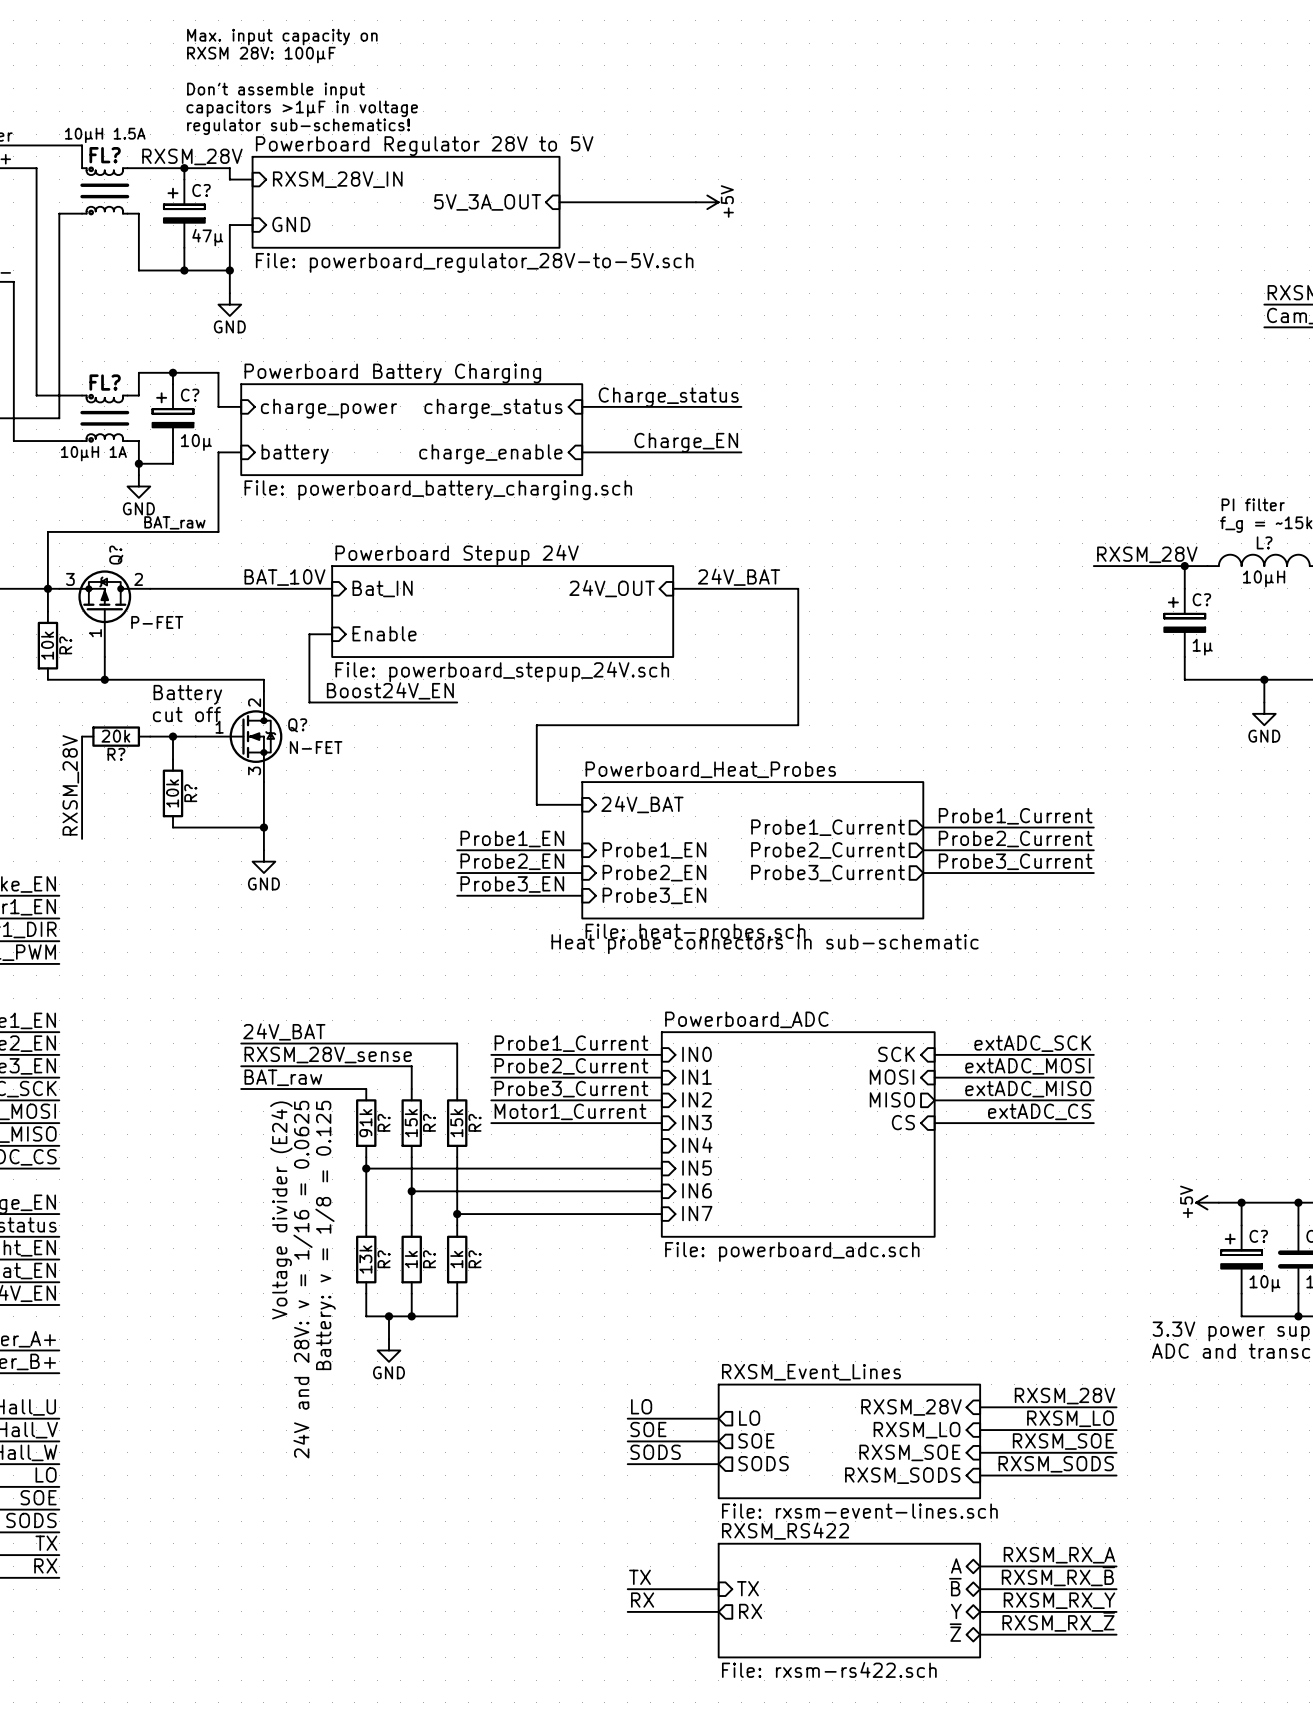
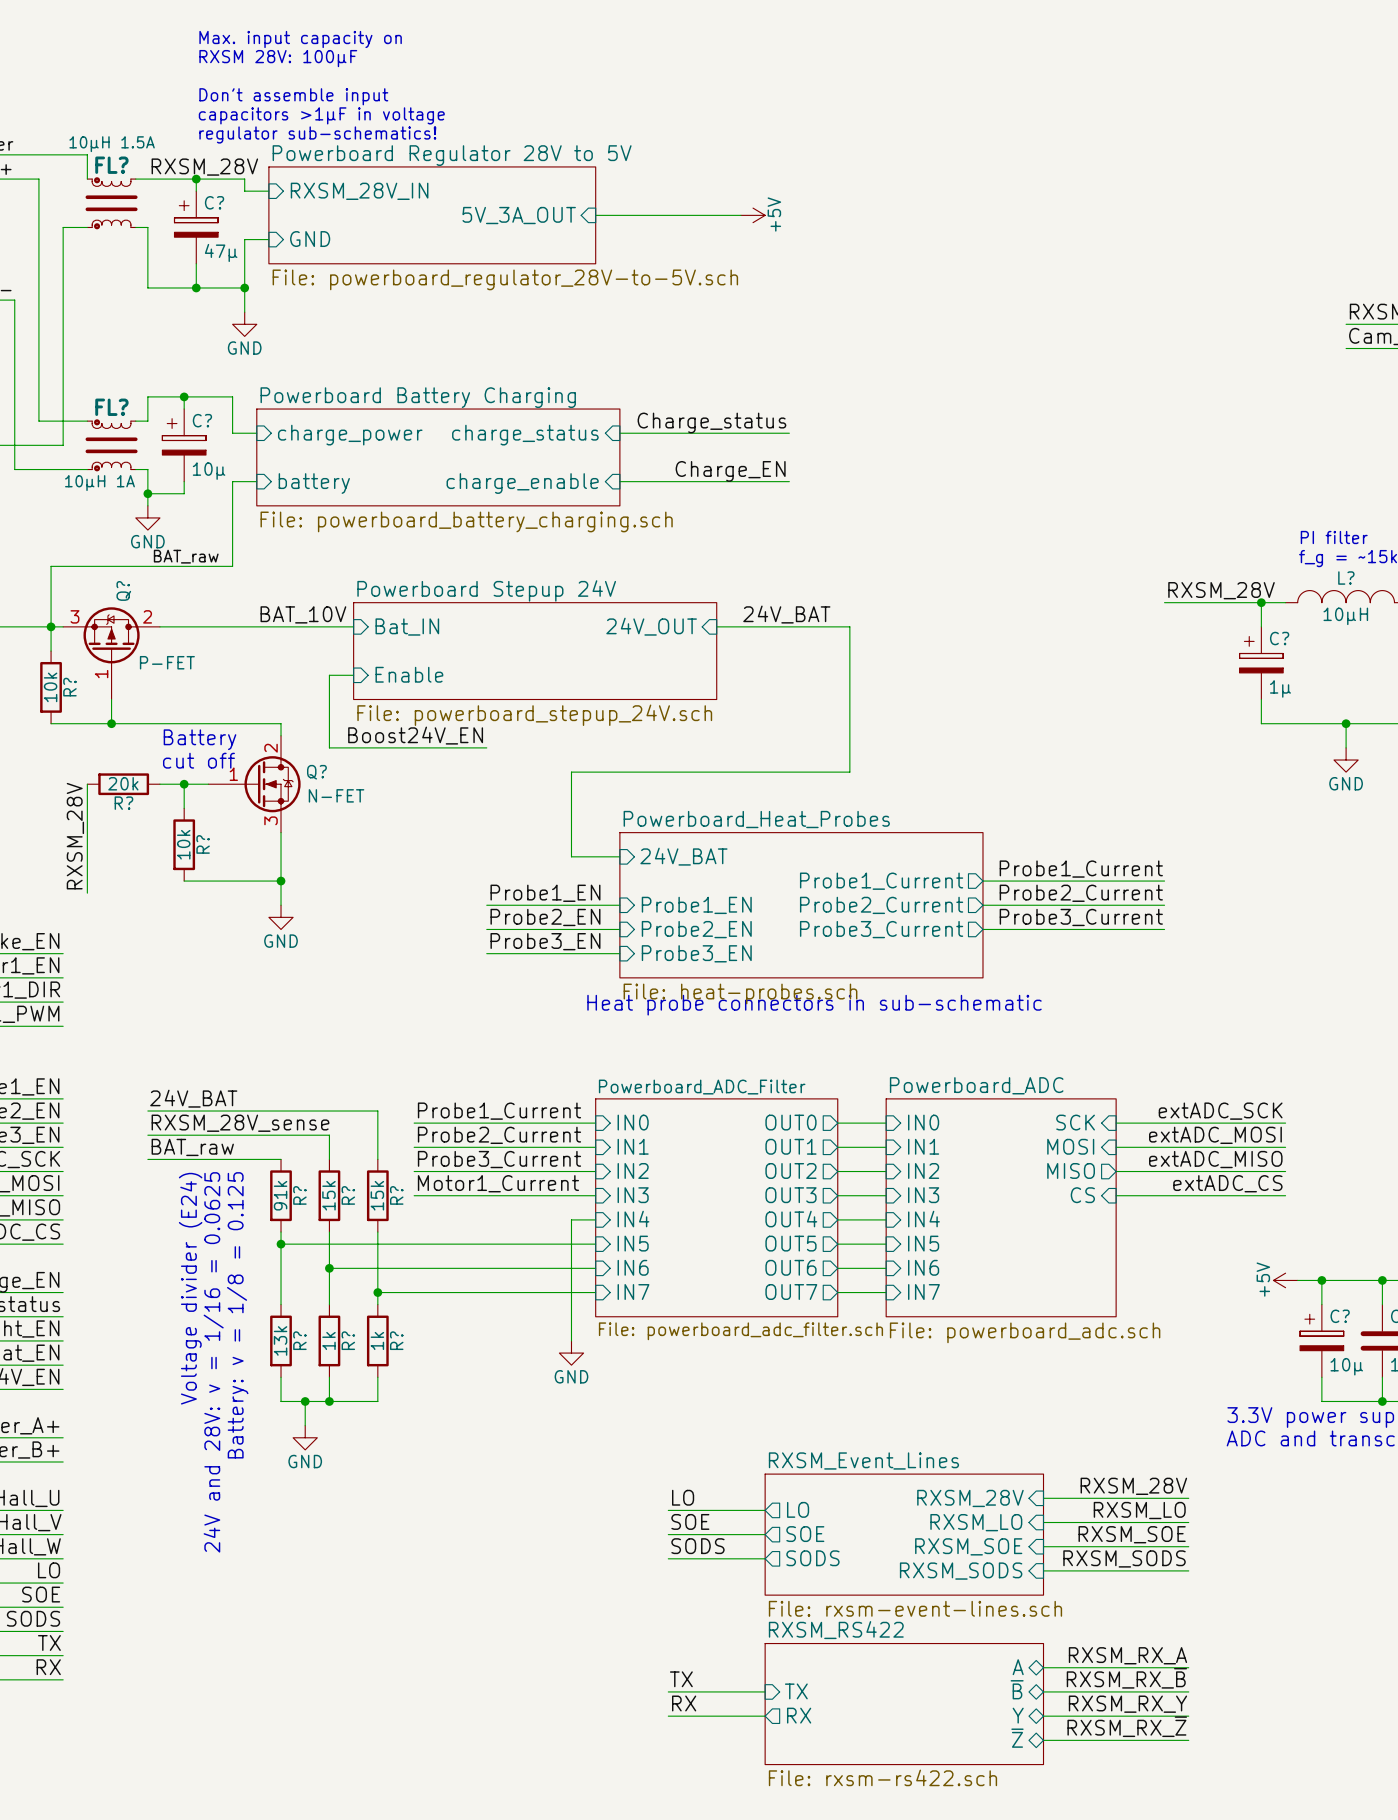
label position: 24V_BAT (284, 1031) -> 24V_BAT (193, 1098)
wire: none -> (147, 1111) (256, 1111)
wire: (354, 1043) (457, 1043) (457, 1089) -> (377, 1111) (377, 1159)
label position: Probe1_Current (571, 1043) -> Probe1_Current (499, 1111)
label position: extADC_SCK (1032, 1043) -> extADC_SCK (1220, 1111)
wire: (559, 1054) (661, 1054) -> (414, 1123) (523, 1123)
sheet pin: none -> IN0 (633, 1122)
sheet pin: IN0 (696, 1054) -> none
sheet pin: none -> OUT0 (790, 1122)
wire: none -> (837, 1123) (886, 1123)
sheet pin: none -> IN0 (923, 1122)
sheet pin position: SCK (896, 1054) -> SCK (1075, 1122)
wire: (934, 1054) (1048, 1054) -> (1164, 1123) (1285, 1123)
label position: RXSM_28V_sense (328, 1055) -> RXSM_28V_sense (240, 1123)
wire: none -> (147, 1135) (256, 1135)
wire: (309, 1066) (411, 1066) (411, 1089) -> (329, 1135) (329, 1159)
label position: Probe2_Current (571, 1066) -> Probe2_Current (499, 1135)
label position: extADC_MOSI (1027, 1066) -> extADC_MOSI (1215, 1135)
label position: BAT_raw (283, 1077) -> BAT_raw (192, 1147)
wire: (559, 1077) (661, 1077) -> (414, 1147) (523, 1147)
sheet pin: none -> IN1 (633, 1146)
sheet pin: IN1 (696, 1077) -> none
sheet pin: none -> OUT1 (790, 1146)
wire: none -> (837, 1147) (886, 1147)
sheet pin: none -> IN1 (923, 1146)
sheet pin position: MOSI (892, 1077) -> MOSI (1070, 1146)
wire: (934, 1077) (1048, 1077) -> (1164, 1147) (1285, 1147)
wire: none -> (147, 1159) (256, 1159)
wire: (263, 1089) (366, 1089) -> (281, 1244) (389, 1244)
label position: Probe3_Current (571, 1089) -> Probe3_Current (499, 1159)
label position: extADC_MISO (1028, 1089) -> extADC_MISO (1215, 1159)
sheet pin: none -> IN2 (633, 1170)
sheet pin: IN2 (696, 1099) -> none
sheet pin: none -> OUT2 (790, 1170)
sheet pin: none -> IN2 (923, 1170)
sheet pin position: MISO (892, 1099) -> MISO (1071, 1170)
wire: (559, 1100) (661, 1100) -> (414, 1171) (523, 1171)
wire: none -> (837, 1171) (886, 1171)
wire: (934, 1100) (1048, 1100) -> (1164, 1171) (1285, 1171)
label position: Motor1_Current (570, 1111) -> Motor1_Current (498, 1183)
label position: extADC_CS (1039, 1111) -> extADC_CS (1227, 1183)
sheet pin: none -> IN3 (633, 1195)
sheet pin: IN3 (696, 1122) -> none
sheet pin: none -> OUT3 (790, 1195)
sheet pin: none -> IN3 (923, 1195)
sheet pin position: CS (903, 1122) -> CS (1082, 1195)
R?: none -> 15k (329, 1195)
R?: none -> 15k (377, 1195)
R? position: (366, 1123) -> (281, 1195)
R?: 15k (411, 1123) -> none
R?: 15k (457, 1123) -> none
wire: (559, 1123) (661, 1123) -> (414, 1195) (523, 1195)
wire: none -> (837, 1195) (886, 1195)
wire: (934, 1123) (1048, 1123) -> (1164, 1195) (1285, 1195)
sheet Powerboard_ADC_Filter: none -> File: powerboard_adc_filter.sch (716, 1207)
sheet Powerboard_ADC: File: powerboard_adc.sch (798, 1134) -> none
sheet Powerboard_ADC: none -> File: powerboard_adc.sch (1001, 1207)
wire: none -> (595, 1219) (571, 1219) (571, 1340)
sheet pin: none -> IN4 (633, 1219)
sheet pin: IN4 (697, 1145) -> none
sheet pin: none -> OUT4 (791, 1219)
wire: none -> (837, 1219) (886, 1219)
sheet pin: none -> IN4 (923, 1219)
wire: (366, 1157) (366, 1225) -> (281, 1232) (281, 1304)
wire: (411, 1157) (411, 1225) -> (329, 1232) (329, 1304)
wire: (457, 1157) (457, 1225) -> (377, 1232) (377, 1304)
junction: none -> (281, 1244)
junction: (366, 1168) -> none
wire: (559, 1168) (661, 1168) -> none
sheet pin: none -> IN5 (633, 1243)
sheet pin: IN5 (696, 1168) -> none
sheet pin: none -> OUT5 (790, 1243)
wire: none -> (837, 1244) (886, 1244)
sheet pin: none -> IN5 (923, 1243)
sheet pin: none -> IN6 (633, 1267)
sheet pin: IN6 (696, 1190) -> none
sheet pin: none -> OUT6 (790, 1267)
sheet pin: none -> IN6 (923, 1267)
wire: none -> (329, 1268) (438, 1268)
junction: none -> (329, 1268)
junction: (411, 1191) -> none
wire: (559, 1191) (661, 1191) -> none
wire: none -> (837, 1268) (886, 1268)
text position: Voltage divider (E24) (281, 1210) -> Voltage divider (E24) (190, 1288)
sheet pin: none -> IN7 (633, 1292)
sheet pin: IN7 (697, 1213) -> none
sheet pin: none -> OUT7 (791, 1292)
sheet pin: none -> IN7 (923, 1292)
junction: none -> (377, 1292)
junction: (457, 1214) -> none
wire: (559, 1214) (661, 1214) -> (377, 1292) (486, 1292)
wire: none -> (837, 1292) (886, 1292)
text position: Battery: v = 1/8 = 0.125 (325, 1235) -> Battery: v = 1/8 = 0.125 (237, 1315)
R?: none -> 1k (329, 1340)
R?: none -> 1k (377, 1340)
R? position: (366, 1259) -> (281, 1340)
R?: 1k (411, 1259) -> none
R?: 1k (457, 1259) -> none
power symbol: none -> GND (571, 1353)
text position: 24V and 28V: v = 1/16 = 0.0625 (303, 1279) -> 24V and 28V: v = 1/16 = 0.0625 (213, 1362)
wire: (366, 1293) (366, 1316) (457, 1316) (457, 1293) -> (281, 1377) (281, 1401) (377, 1401) (377, 1377)
wire: (411, 1293) (411, 1316) -> (329, 1377) (329, 1401)
junction: none -> (305, 1401)
junction: none -> (329, 1401)
wire: (388, 1316) (388, 1339) -> (305, 1401) (305, 1425)
junction: (388, 1316) -> none
junction: (411, 1316) -> none
power symbol: none -> GND (305, 1437)
power symbol: GND (388, 1350) -> none

